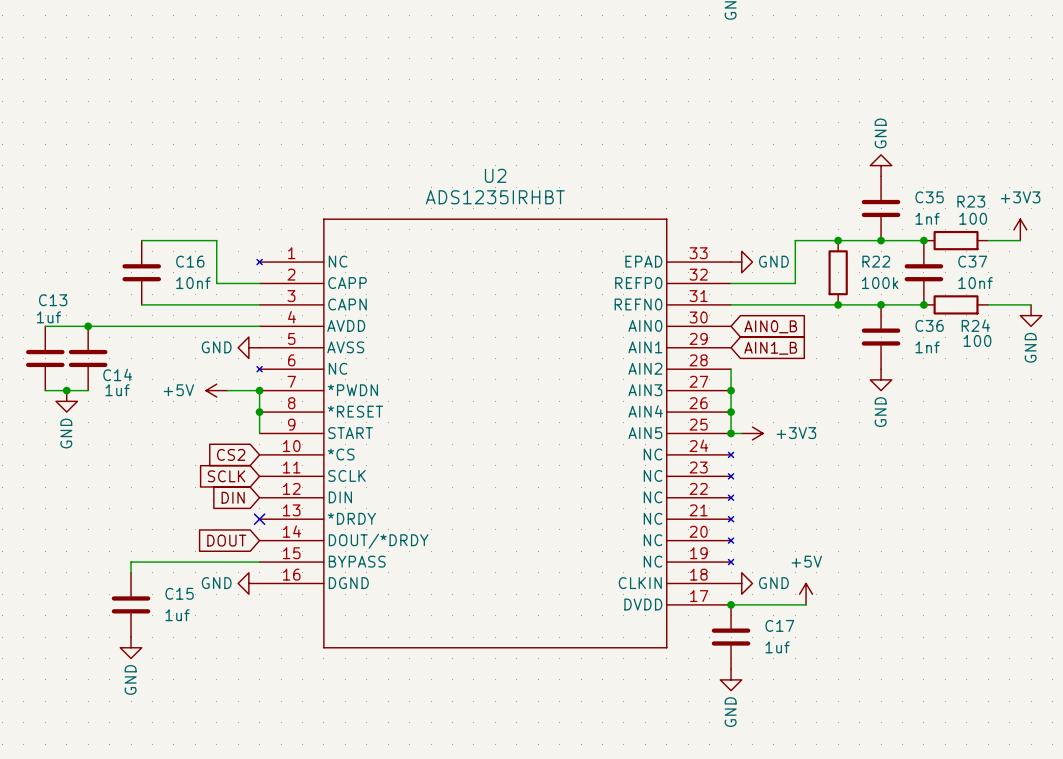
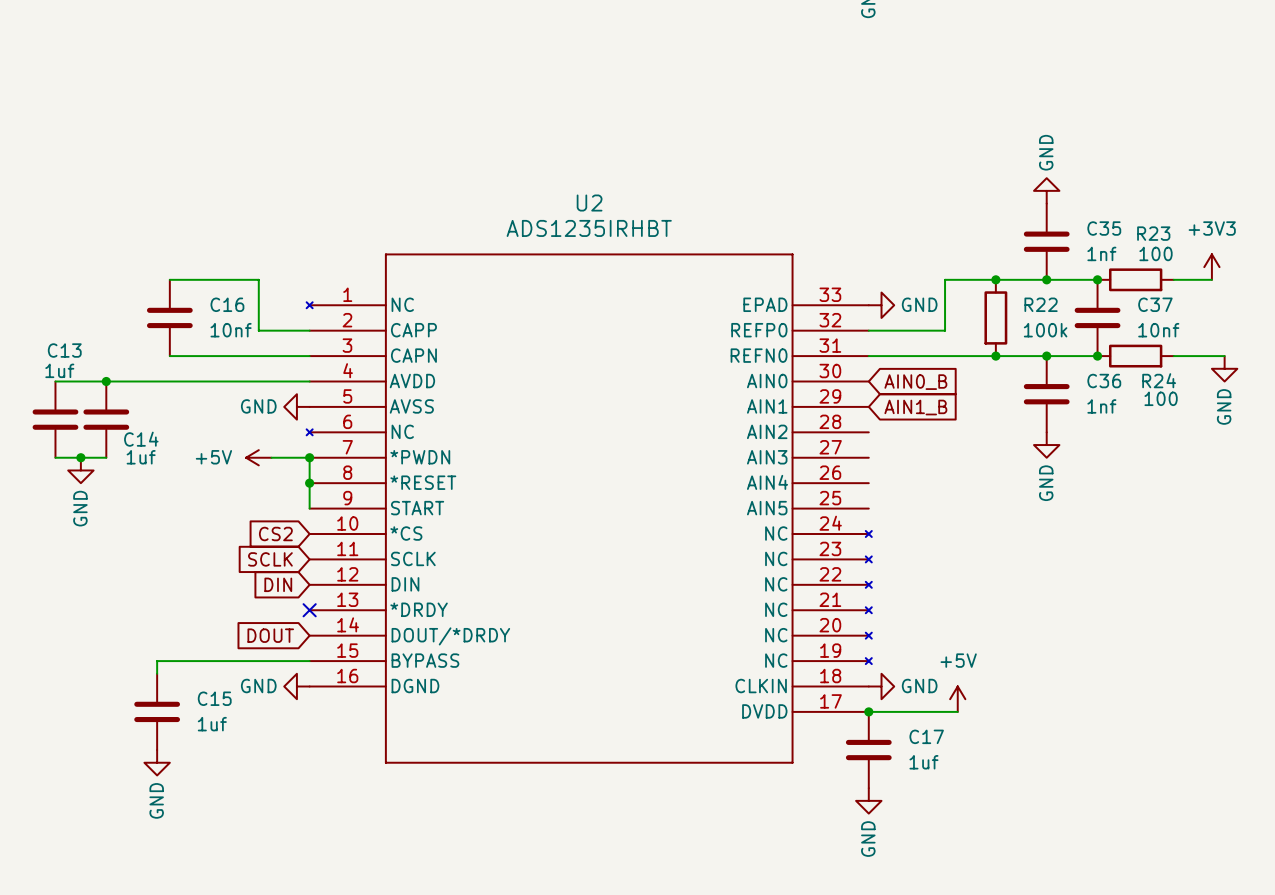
wire: (731, 369) (731, 433) (741, 433) -> none
junction: (731, 390) -> none
junction: (731, 412) -> none
junction: (731, 433) -> none
power symbol: +3V3 (752, 433) -> none

